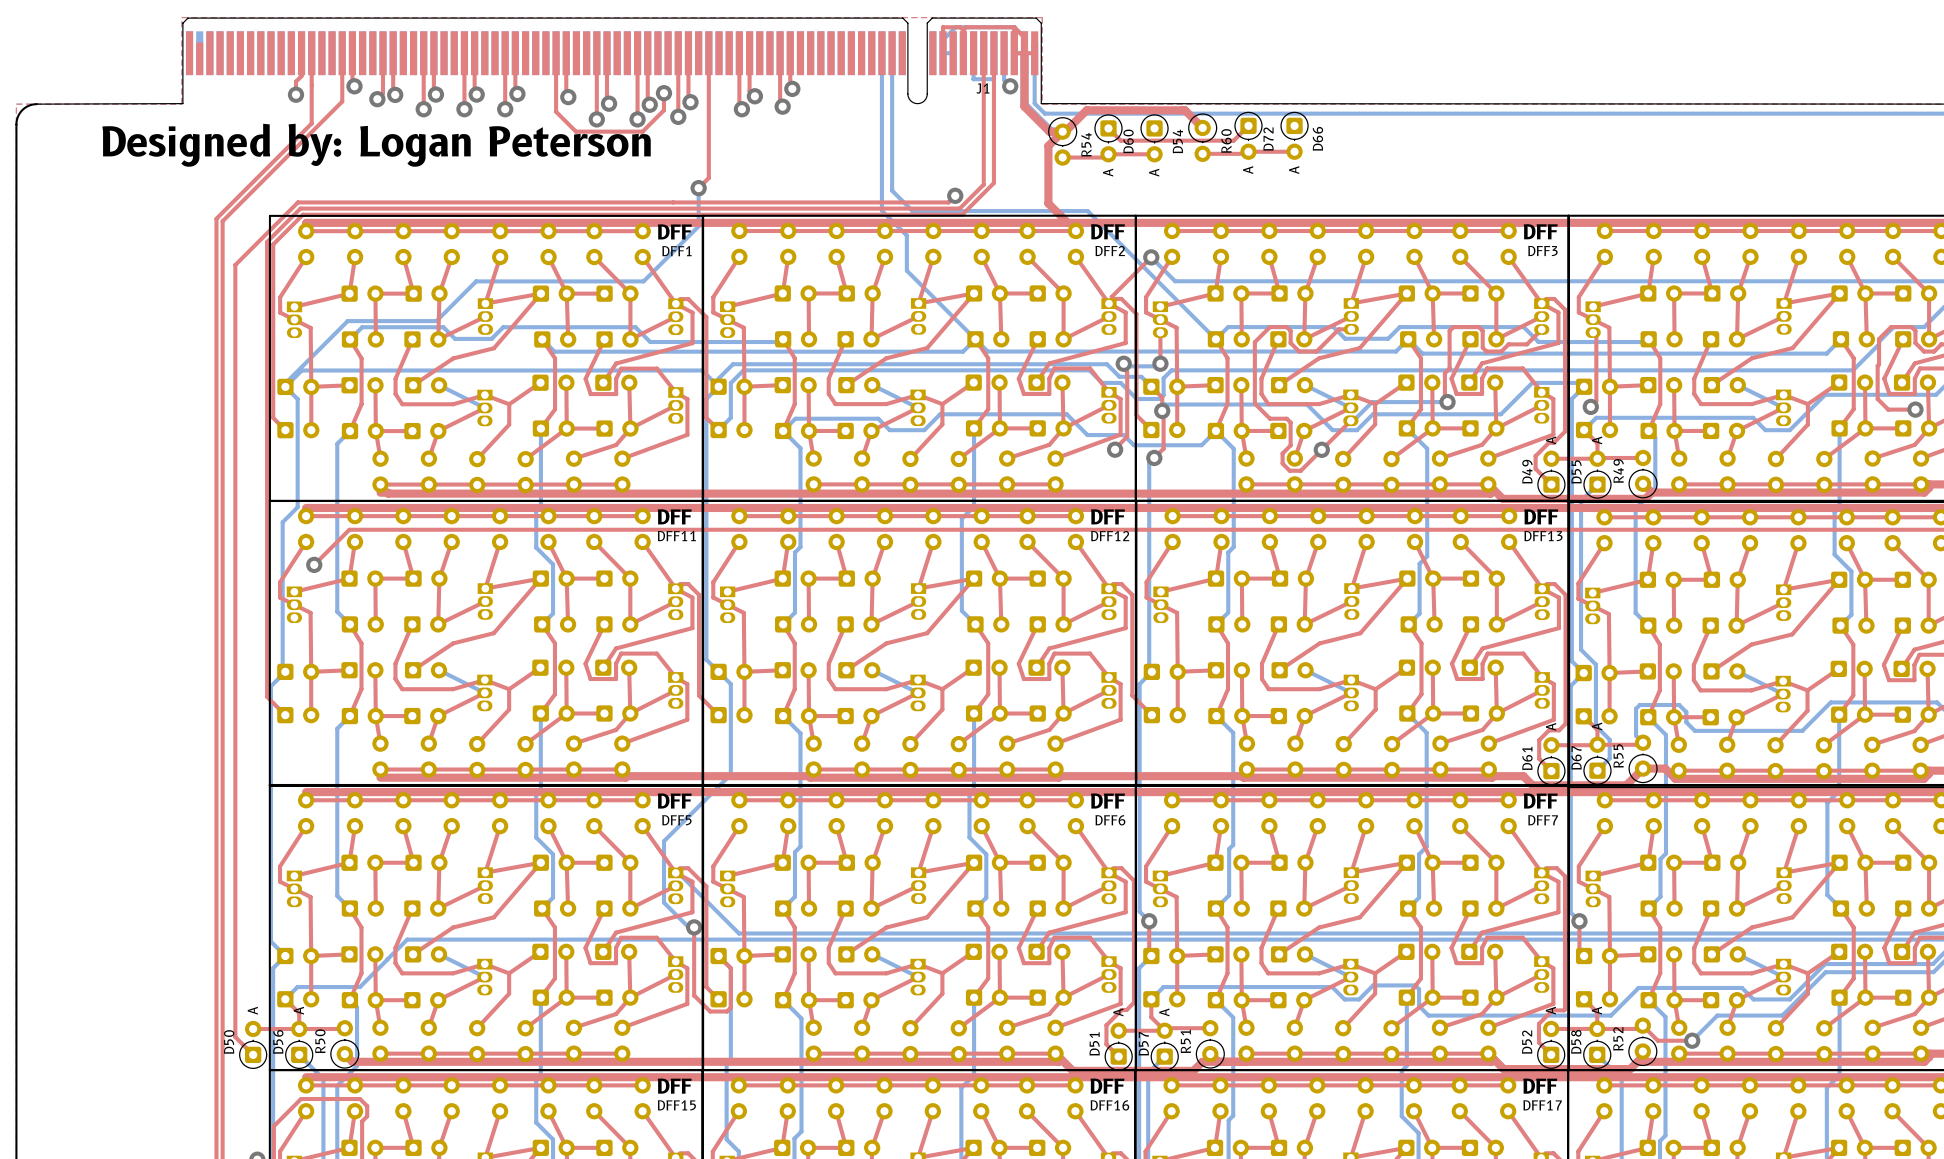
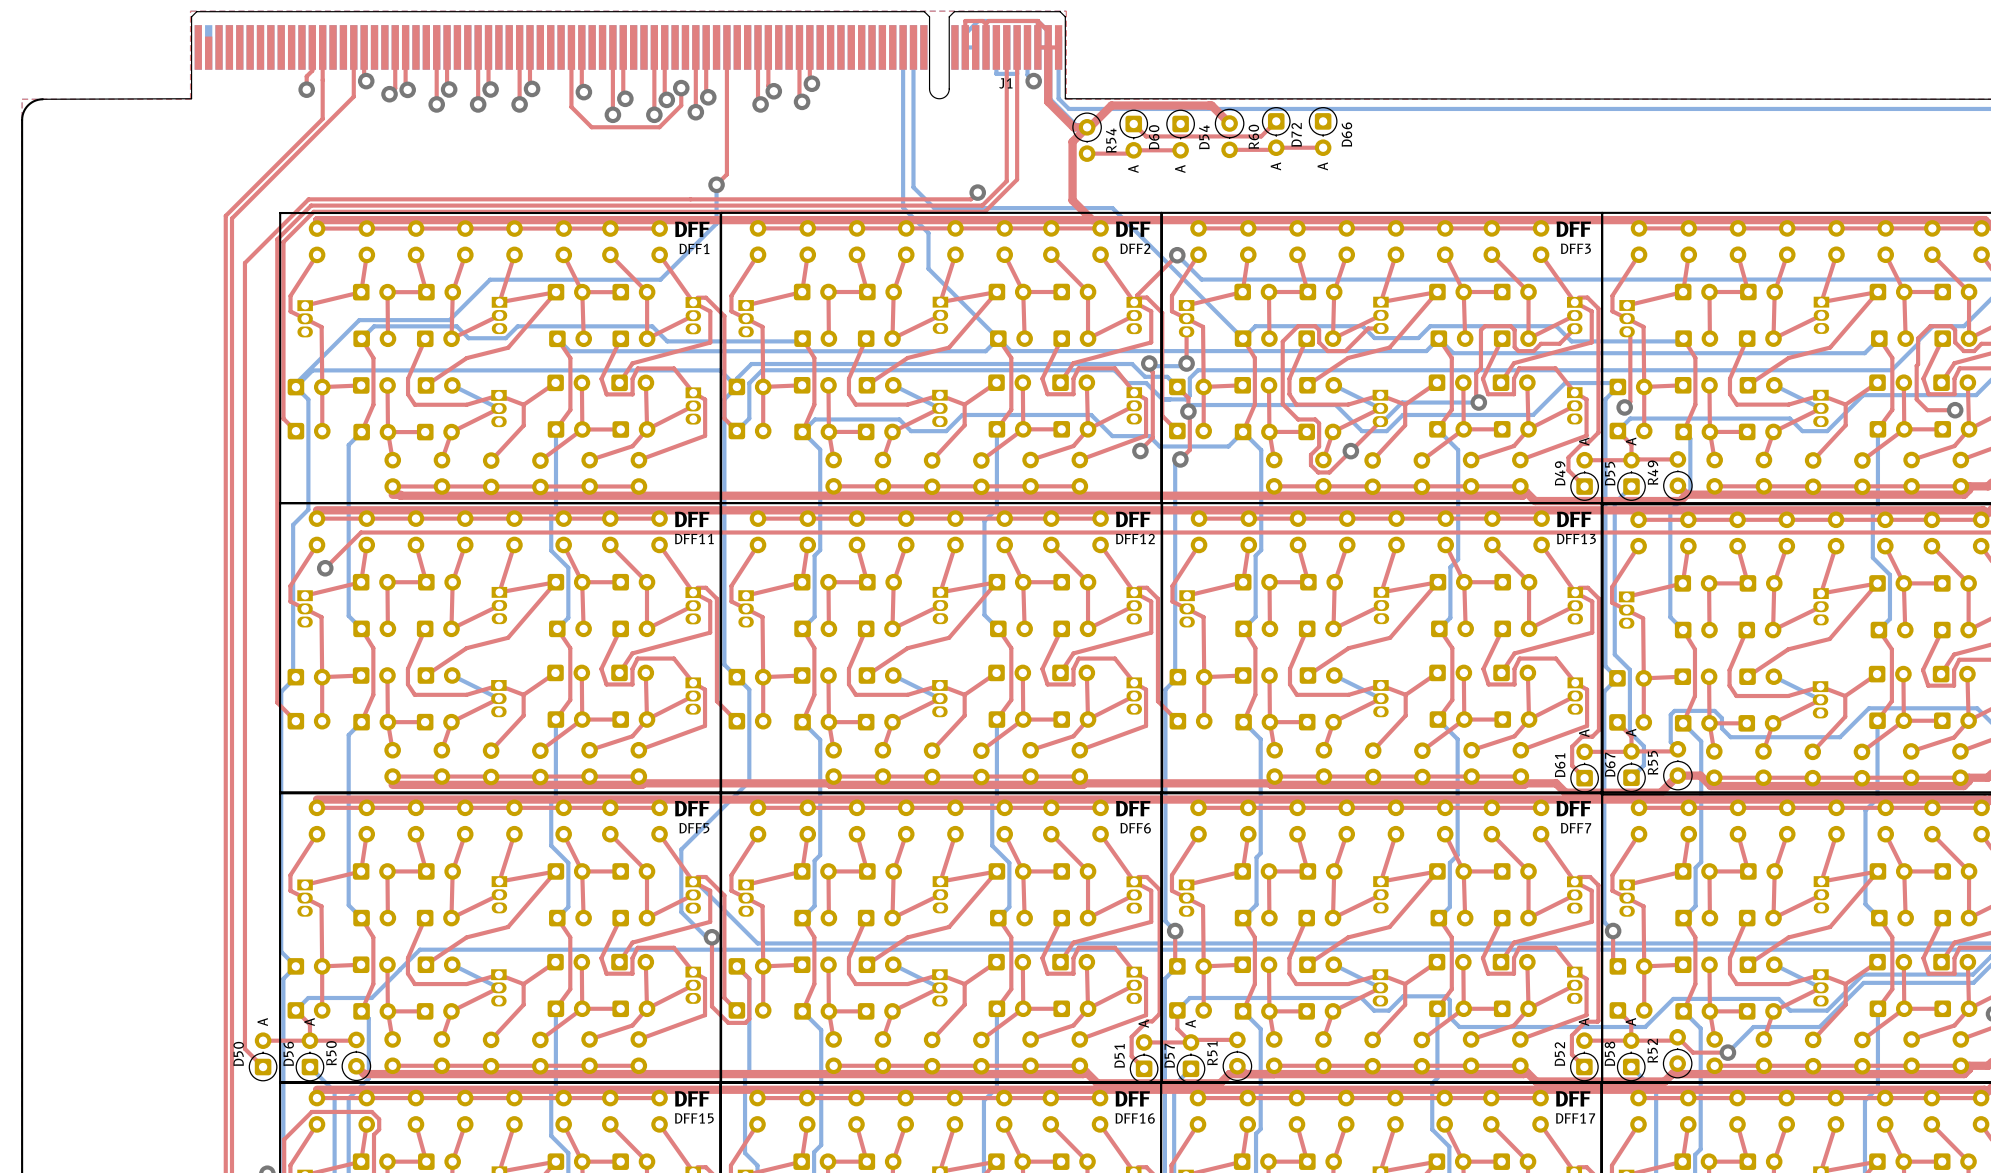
text: Designed by: Logan Peterson (376, 145) -> none

